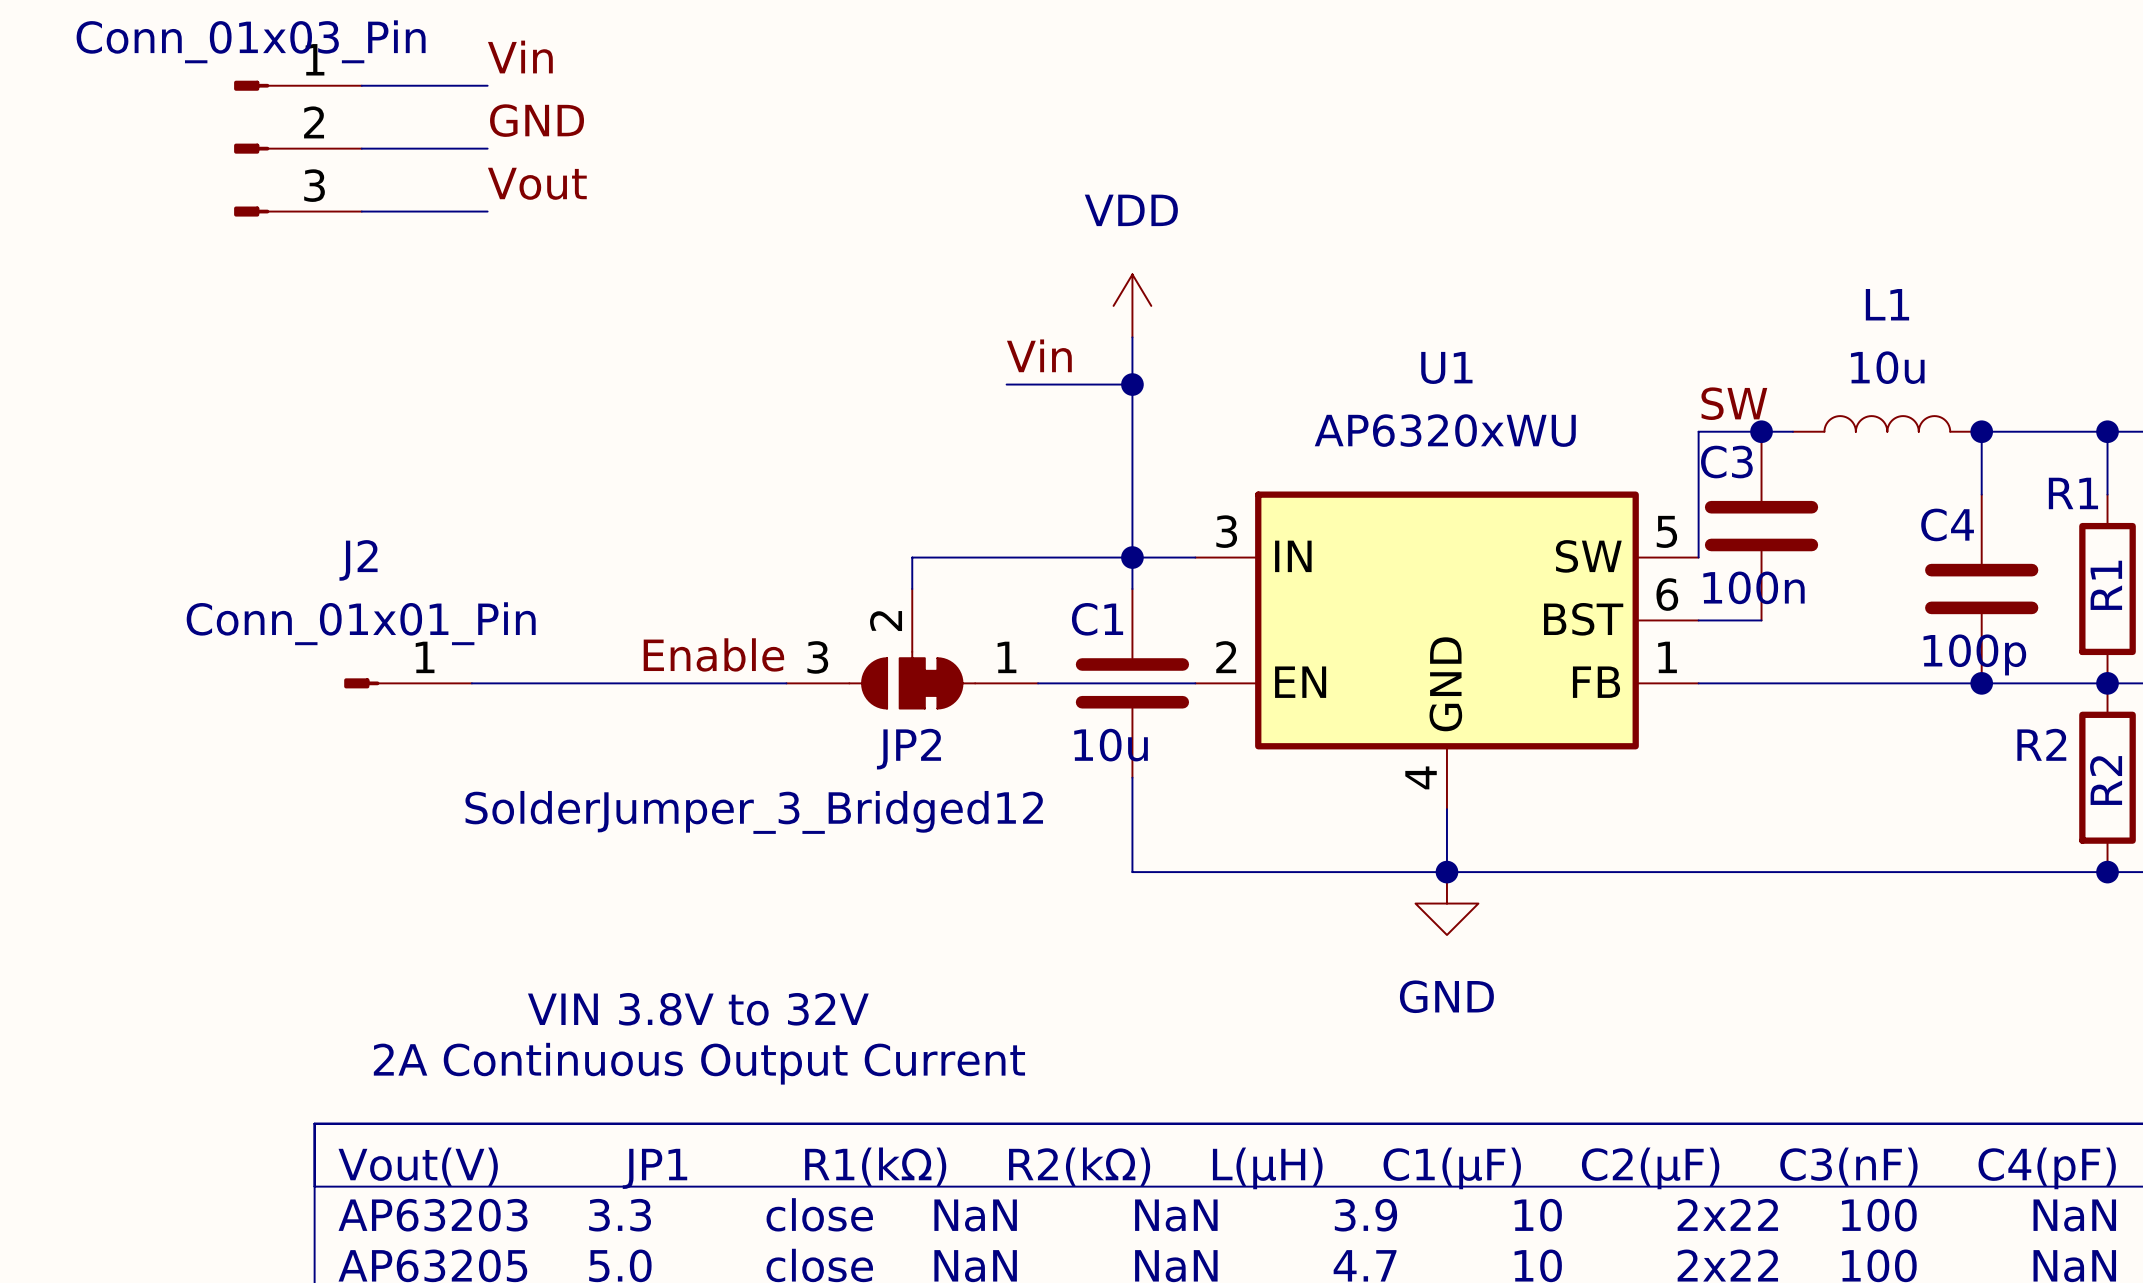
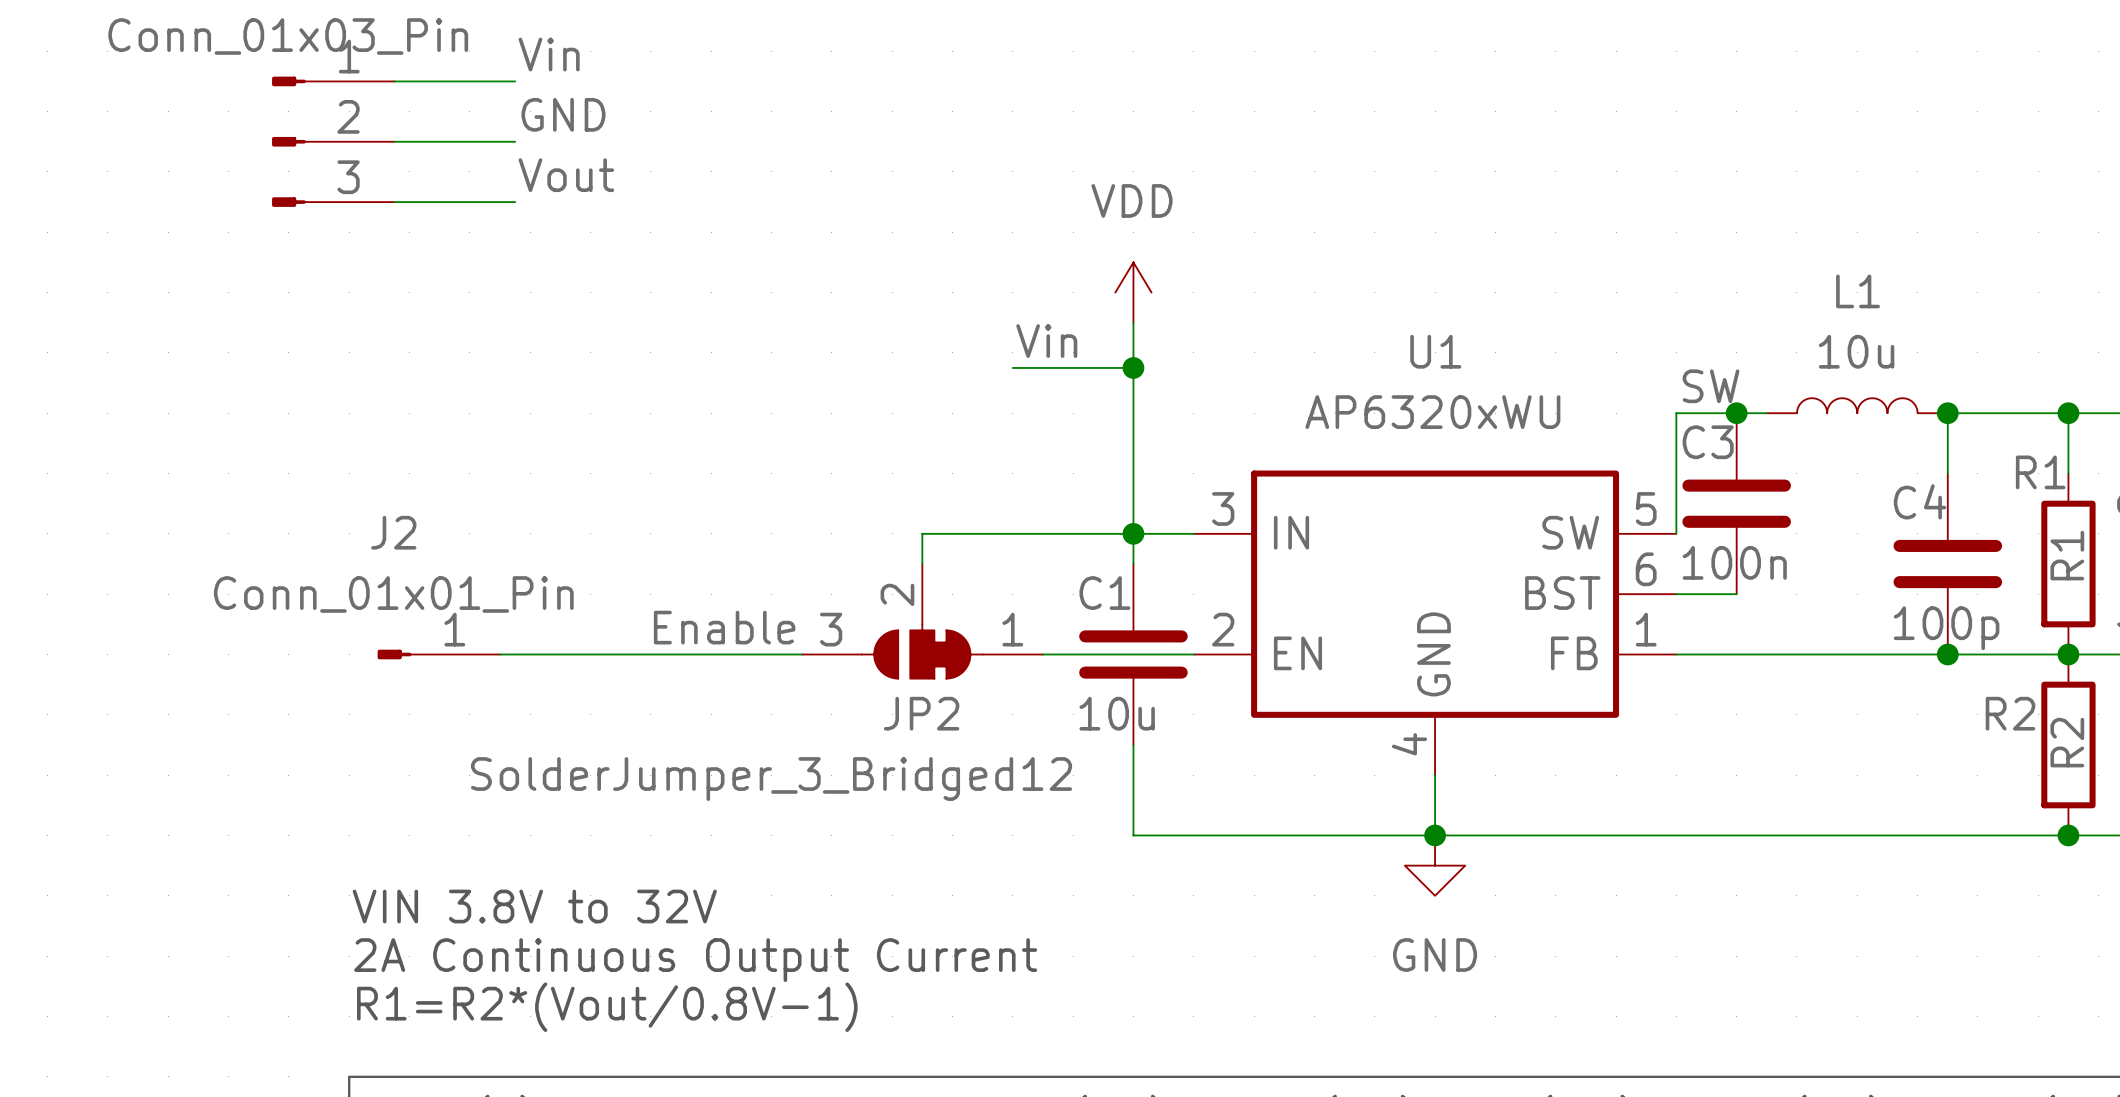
text position: VIN 3.8V to 32V (698, 1009) -> VIN 3.8V to 32V (534, 906)
text: none -> R1=R2*(Vout/0.8V-1) (607, 1007)
text position: 2A Continuous Output Current (699, 1063) -> 2A Continuous Output Current (695, 960)

